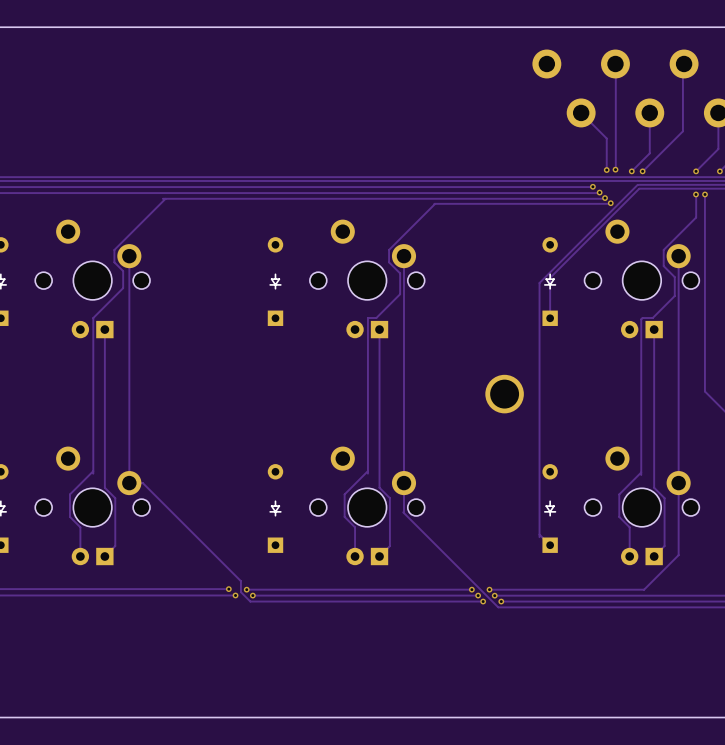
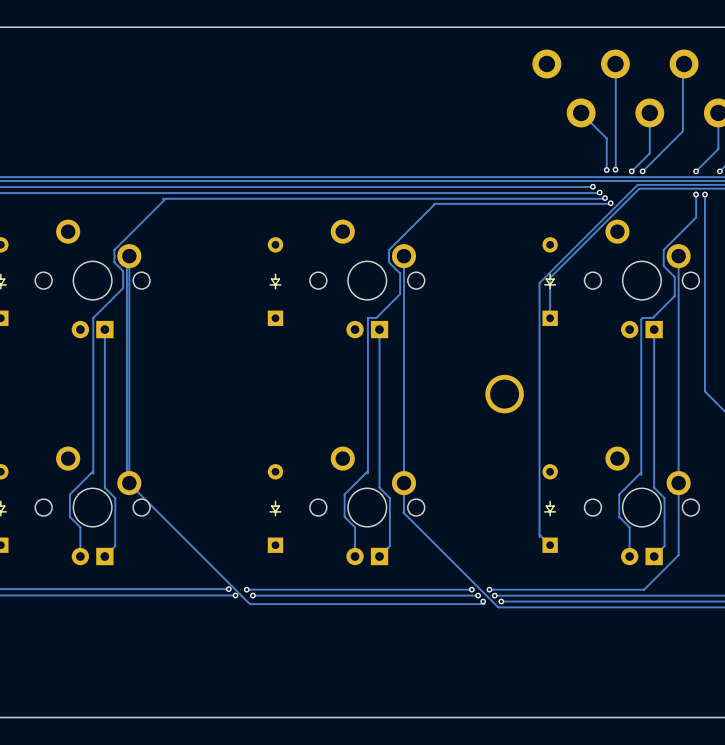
track: none -> (126, 256) (126, 485) (131, 485) (249, 604) (484, 604)
track: (129, 483) (142, 483) (240, 581) (240, 592) (250, 601) (483, 601) -> none

